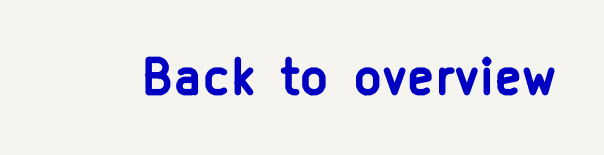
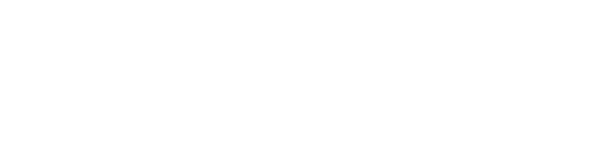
text: Back to overview (350, 76) -> none

